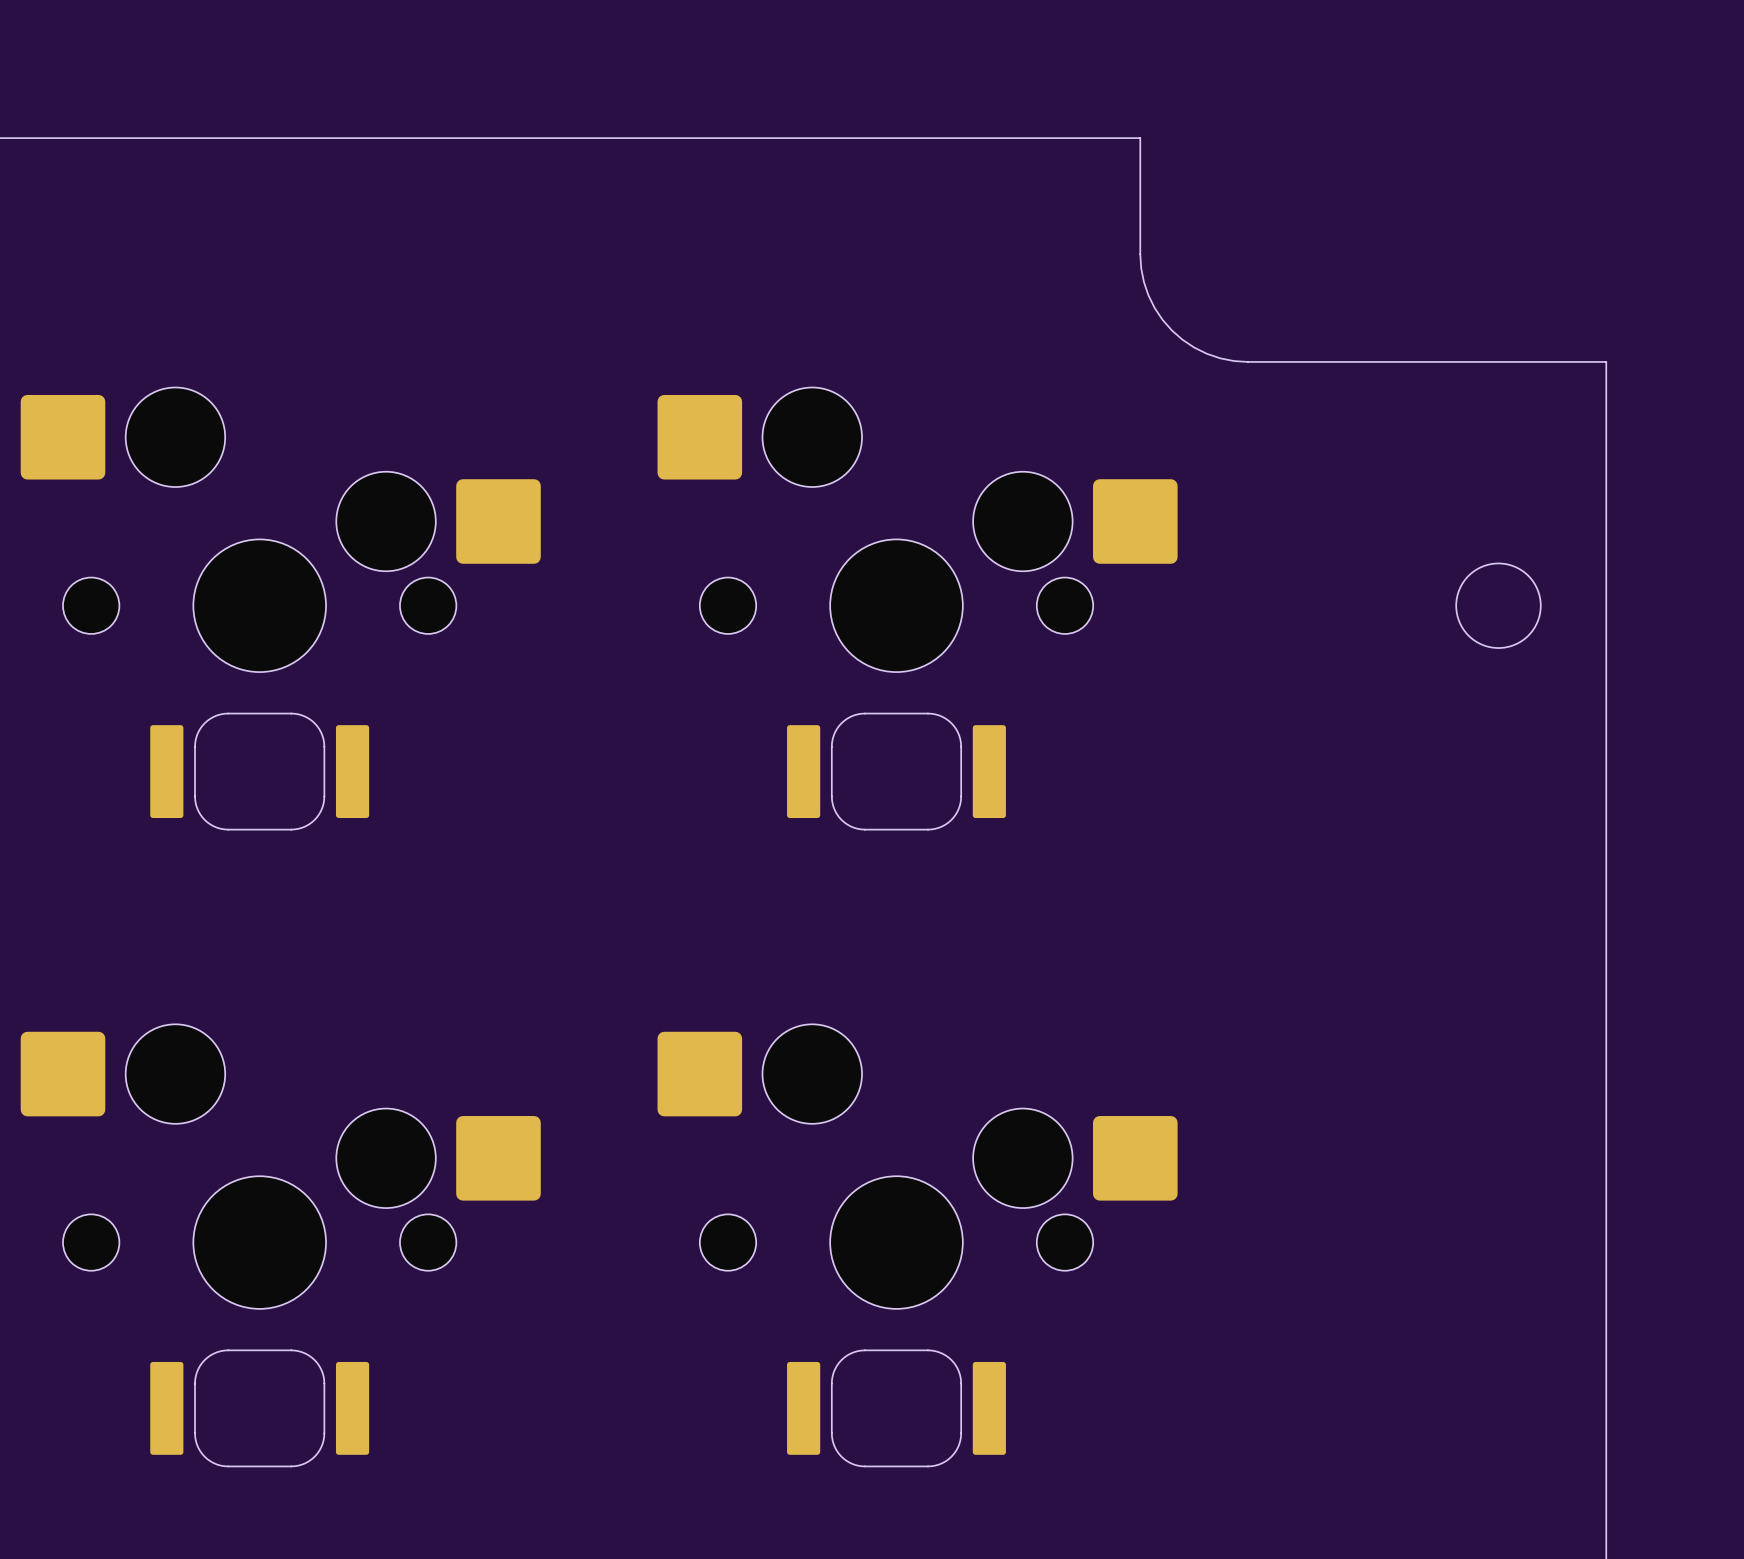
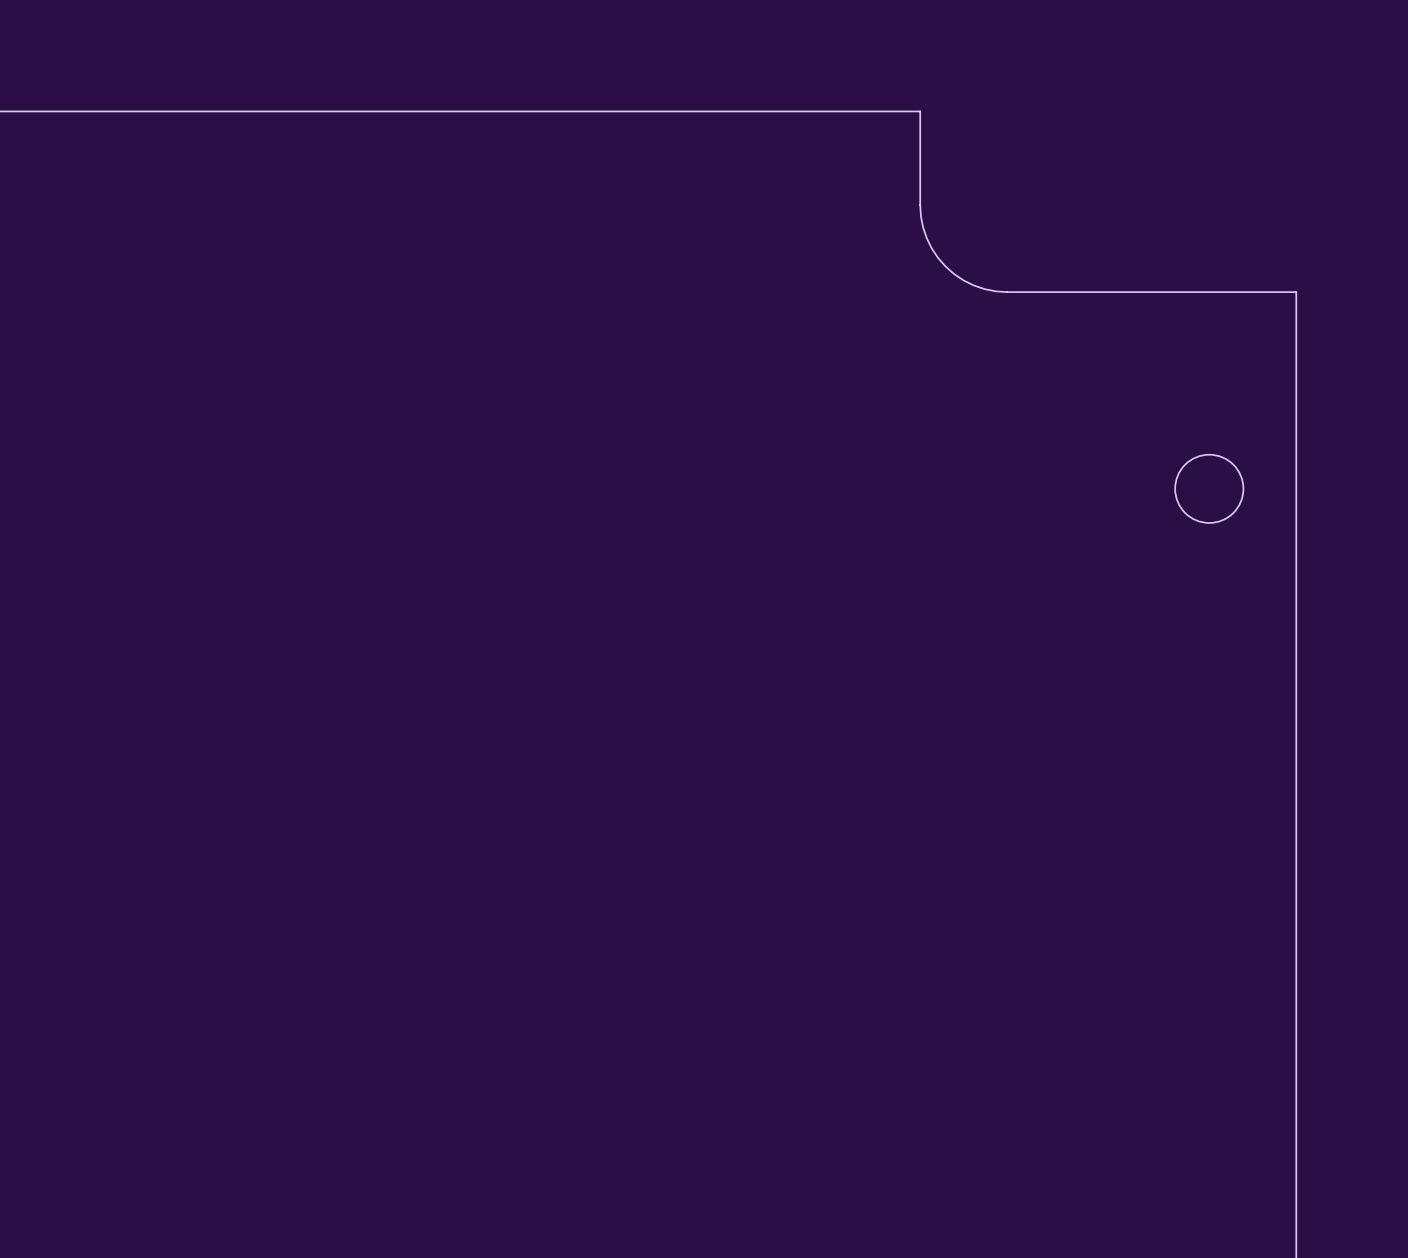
part: (280, 529) -> none
part: (917, 529) -> none
part: (259, 771) -> none
part: (896, 771) -> none
part: (280, 1166) -> none
part: (917, 1166) -> none
part: (259, 1408) -> none
part: (896, 1408) -> none

